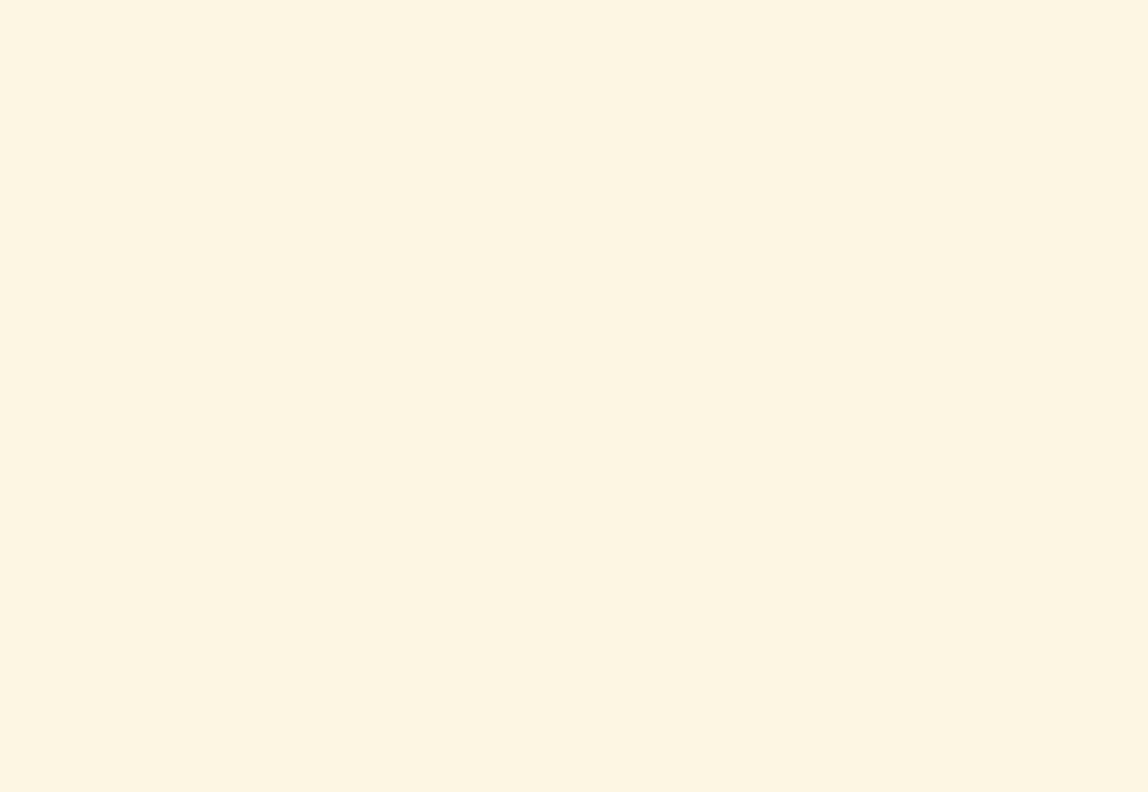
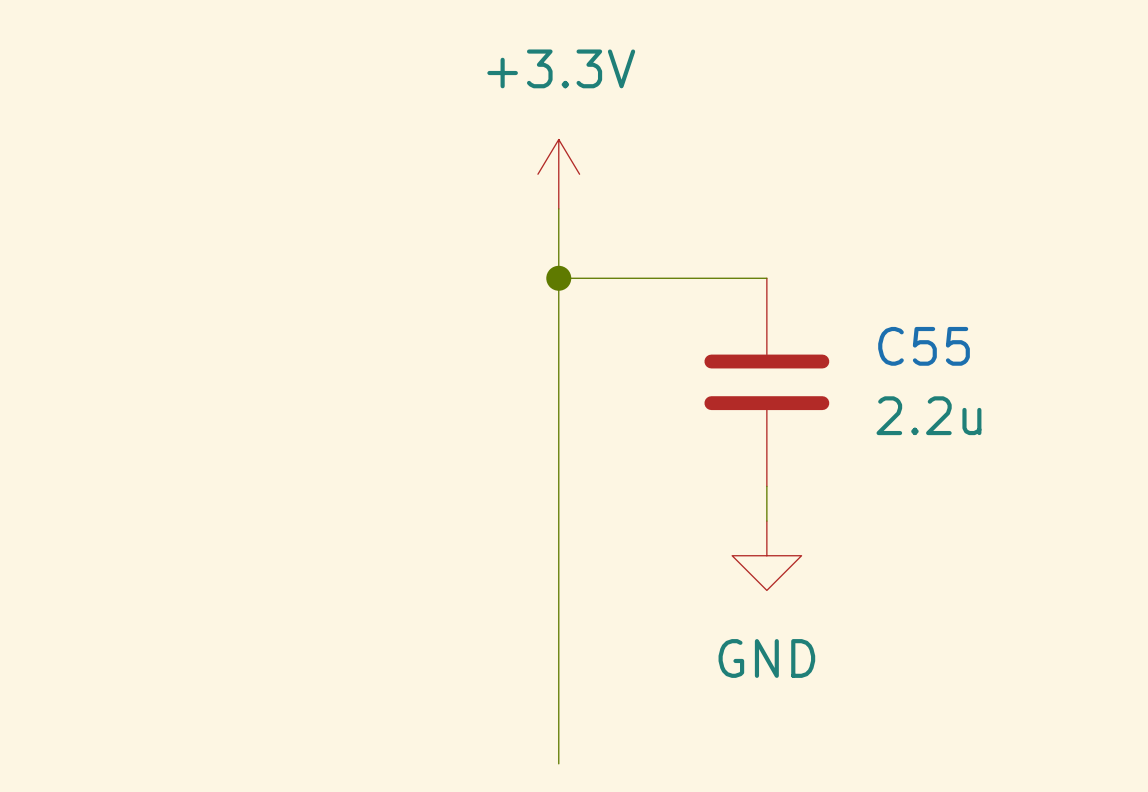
power symbol: none -> +3.3V (558, 174)
wire: none -> (558, 208) (558, 763)
wire: none -> (558, 278) (766, 278)
junction: none -> (558, 278)
C55: none -> 2.2u (766, 382)
wire: none -> (766, 486) (766, 521)
power symbol: none -> GND (766, 555)

